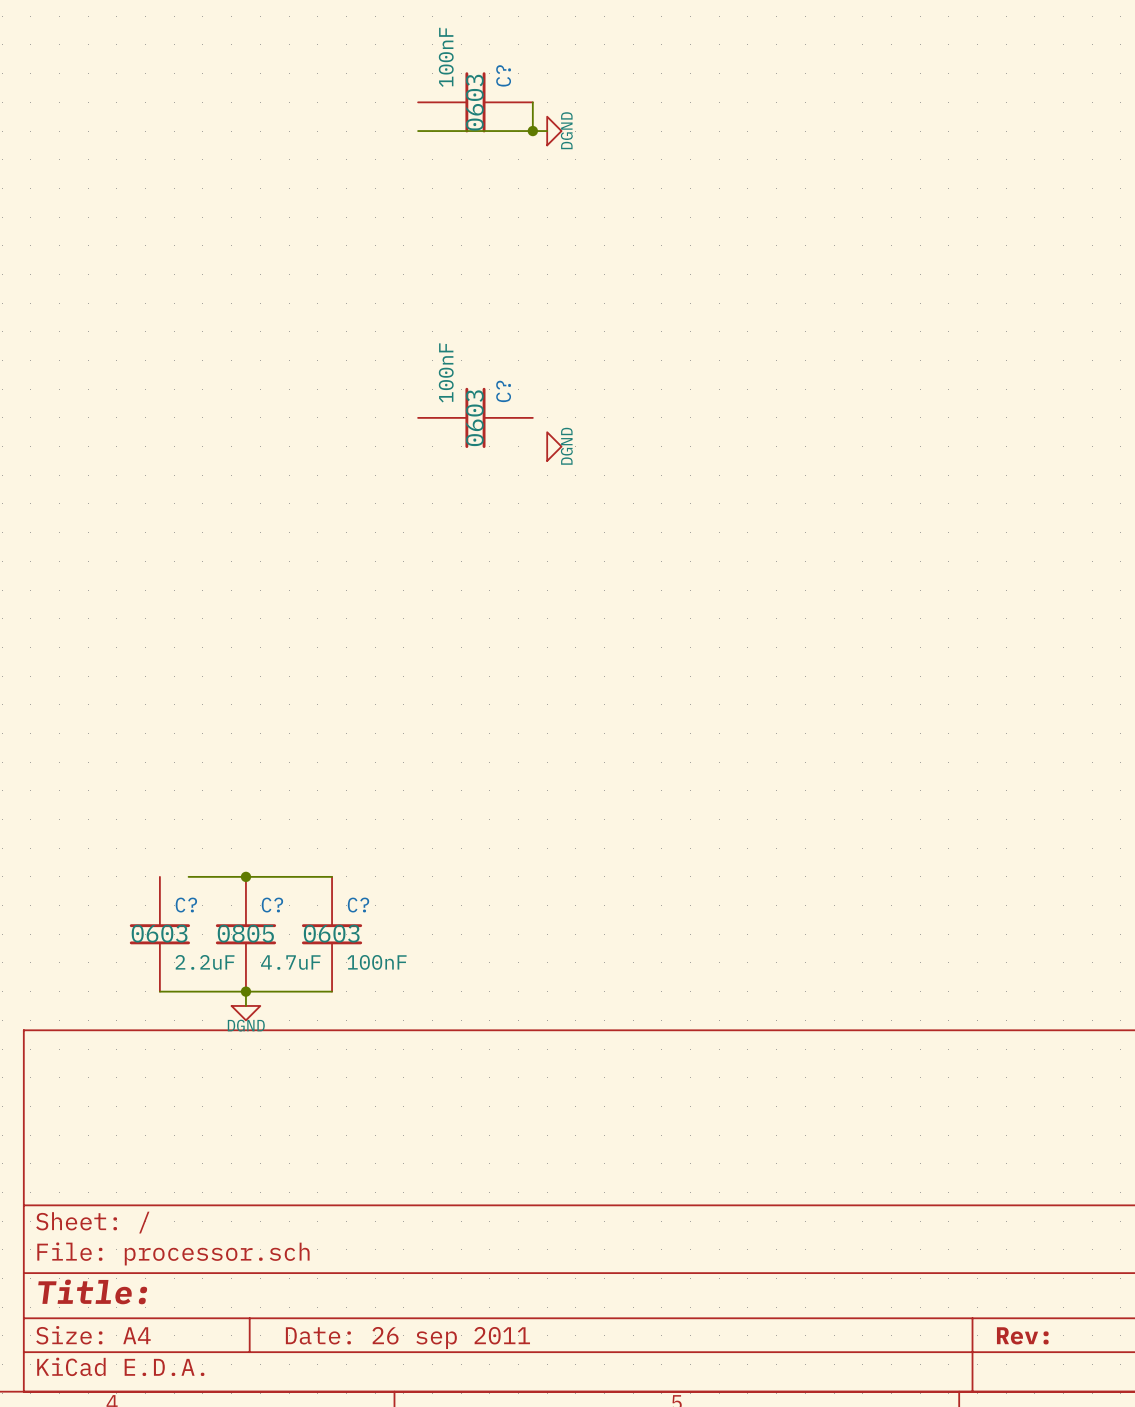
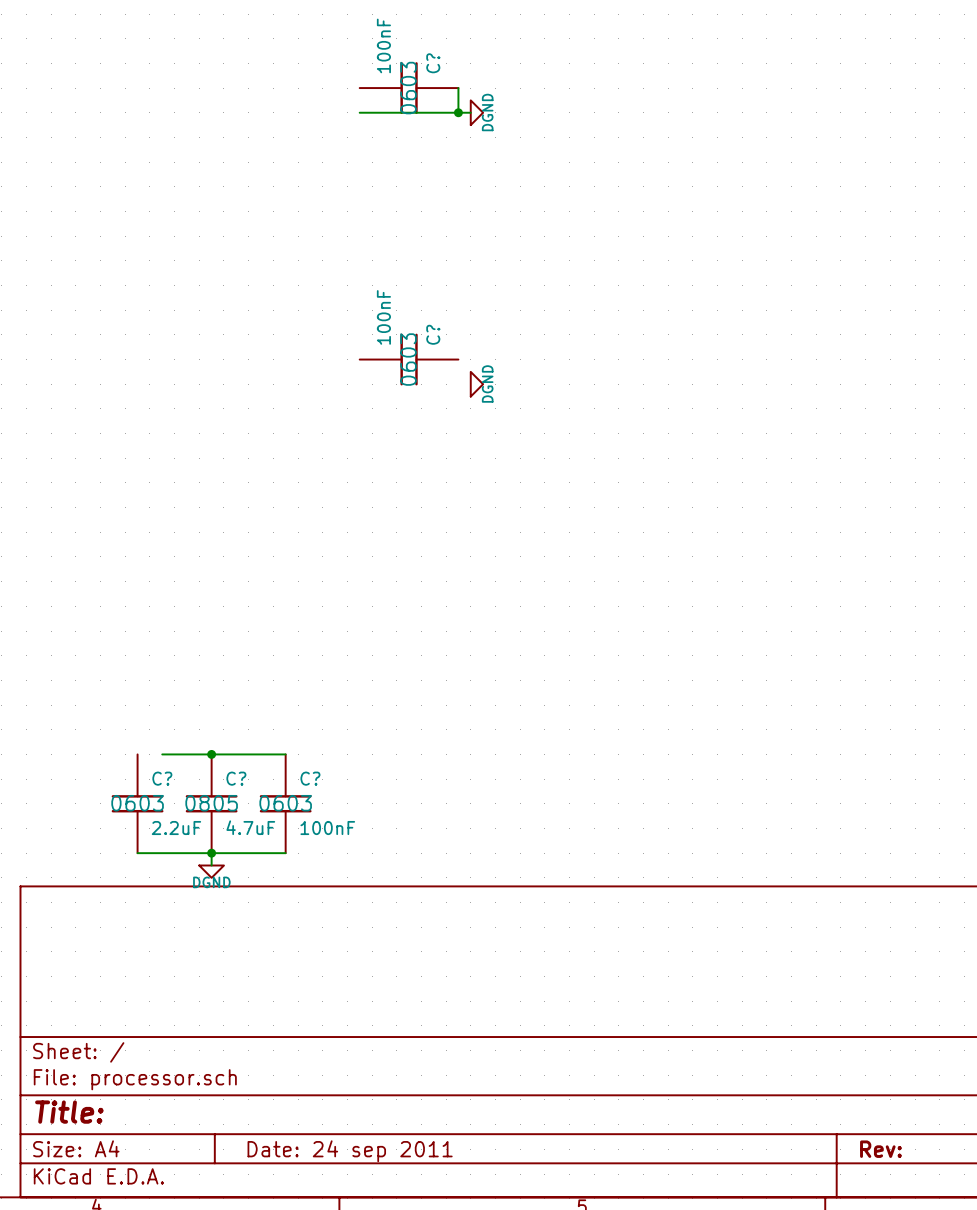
title block: Date: 26 sep 2011 (407, 1338) -> Date: 24 sep 2011 (350, 1151)

